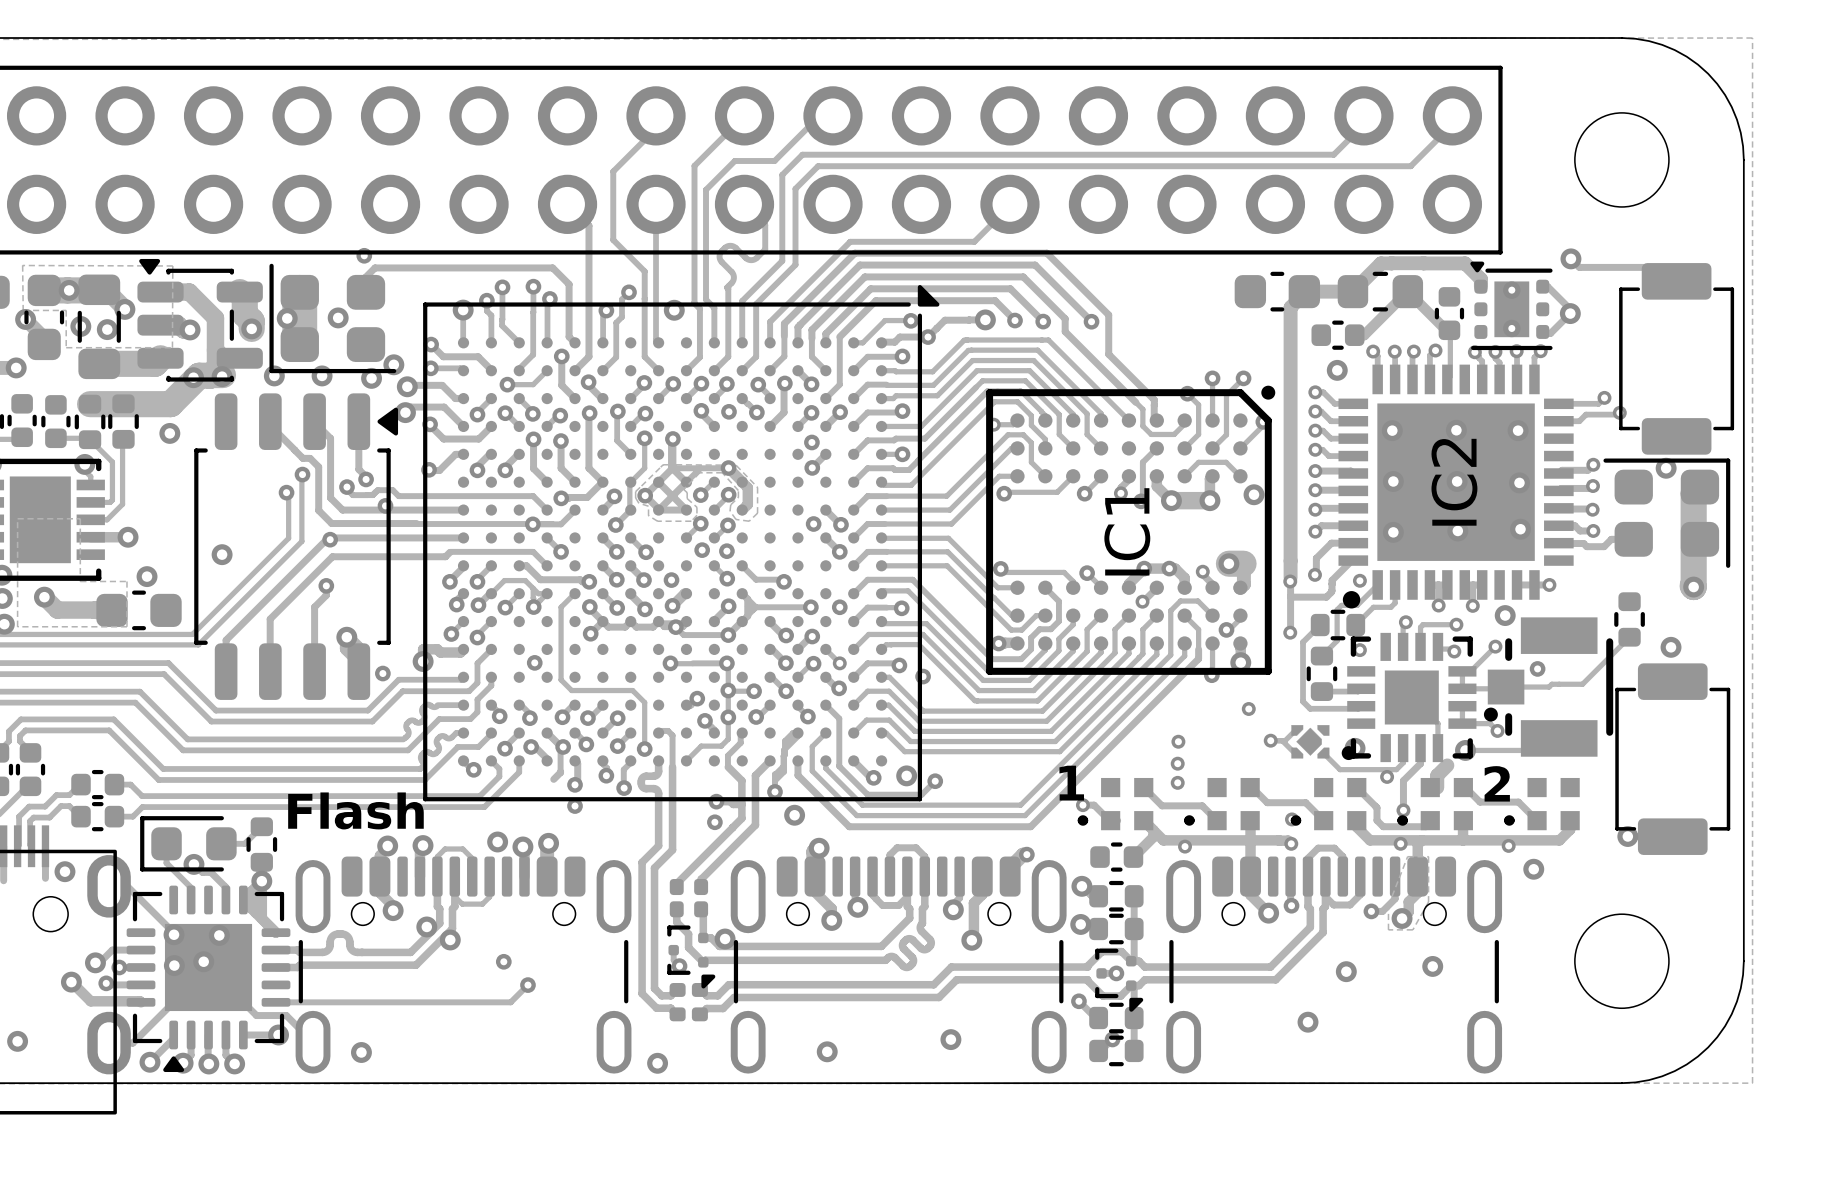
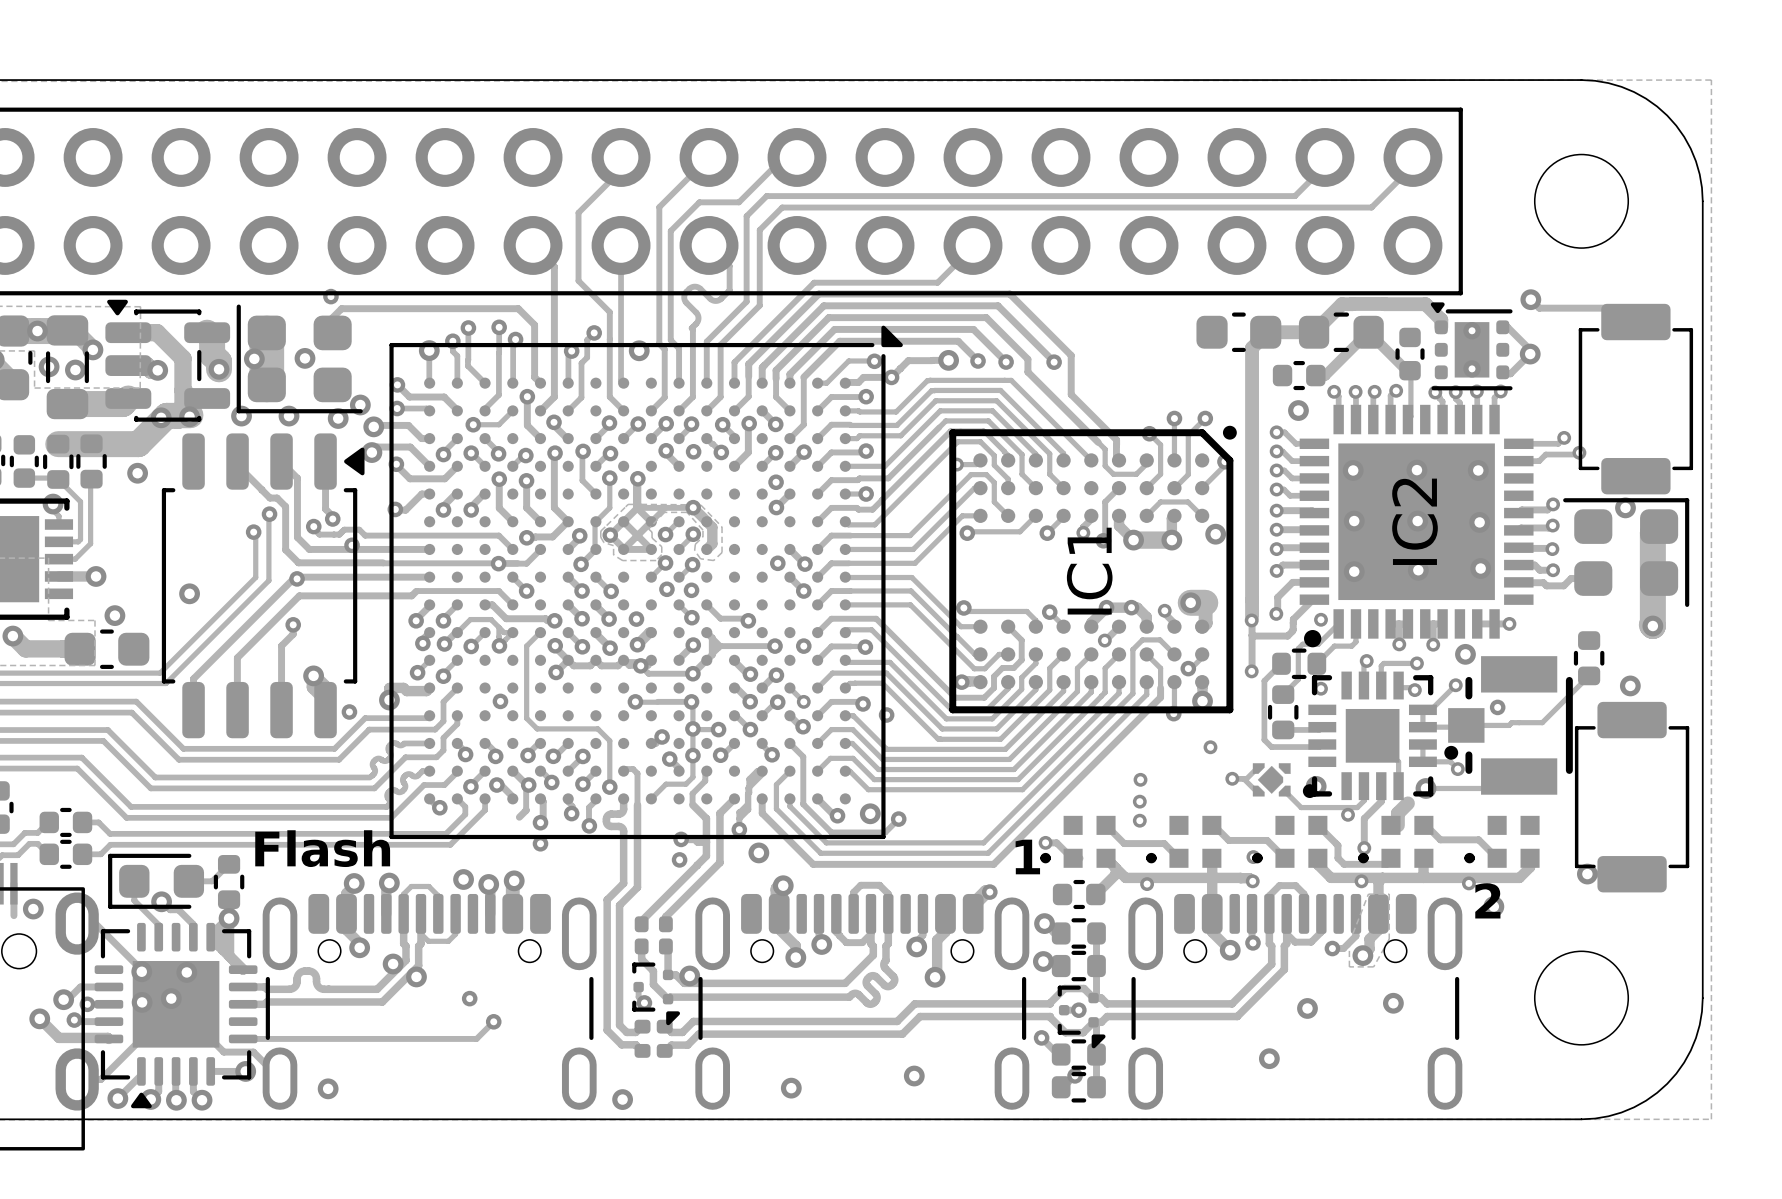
text position: 1 (1071, 783) -> 1 (1027, 856)
text position: 2 (1497, 783) -> 2 (1487, 900)

